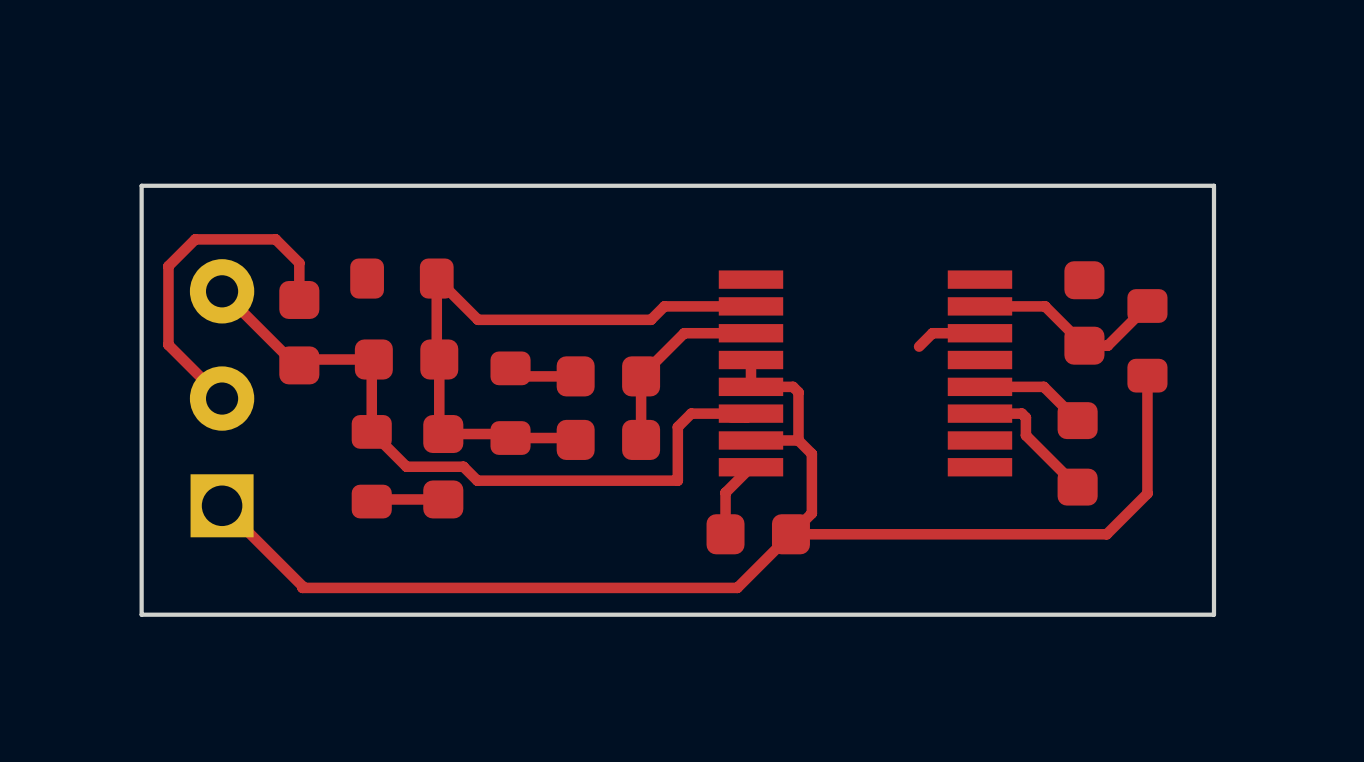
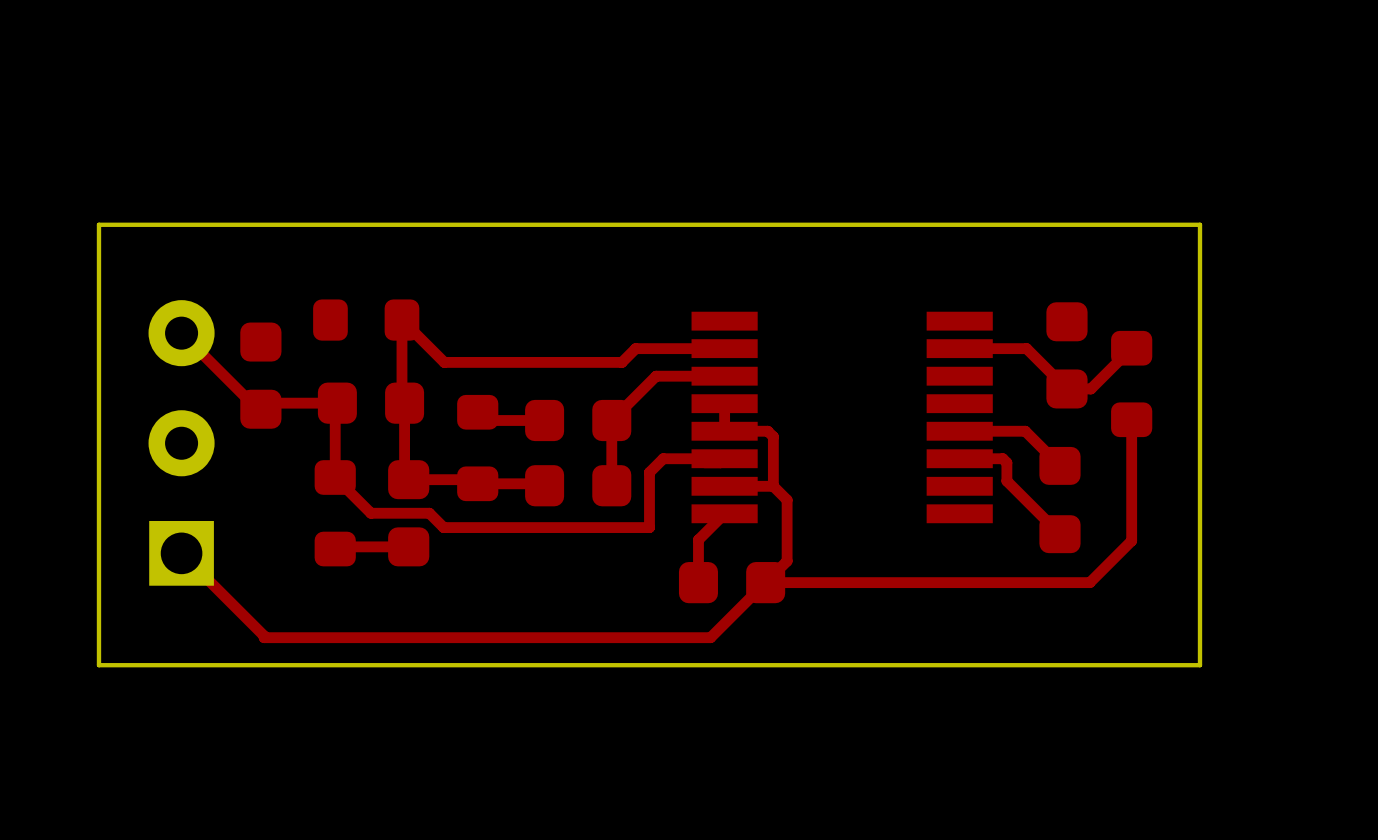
top track: (299, 299) (299, 263) (275, 239) (195, 239) (168, 266) (168, 344) (222, 398) -> none
top track: (979, 333) (932, 333) (919, 346) -> none

